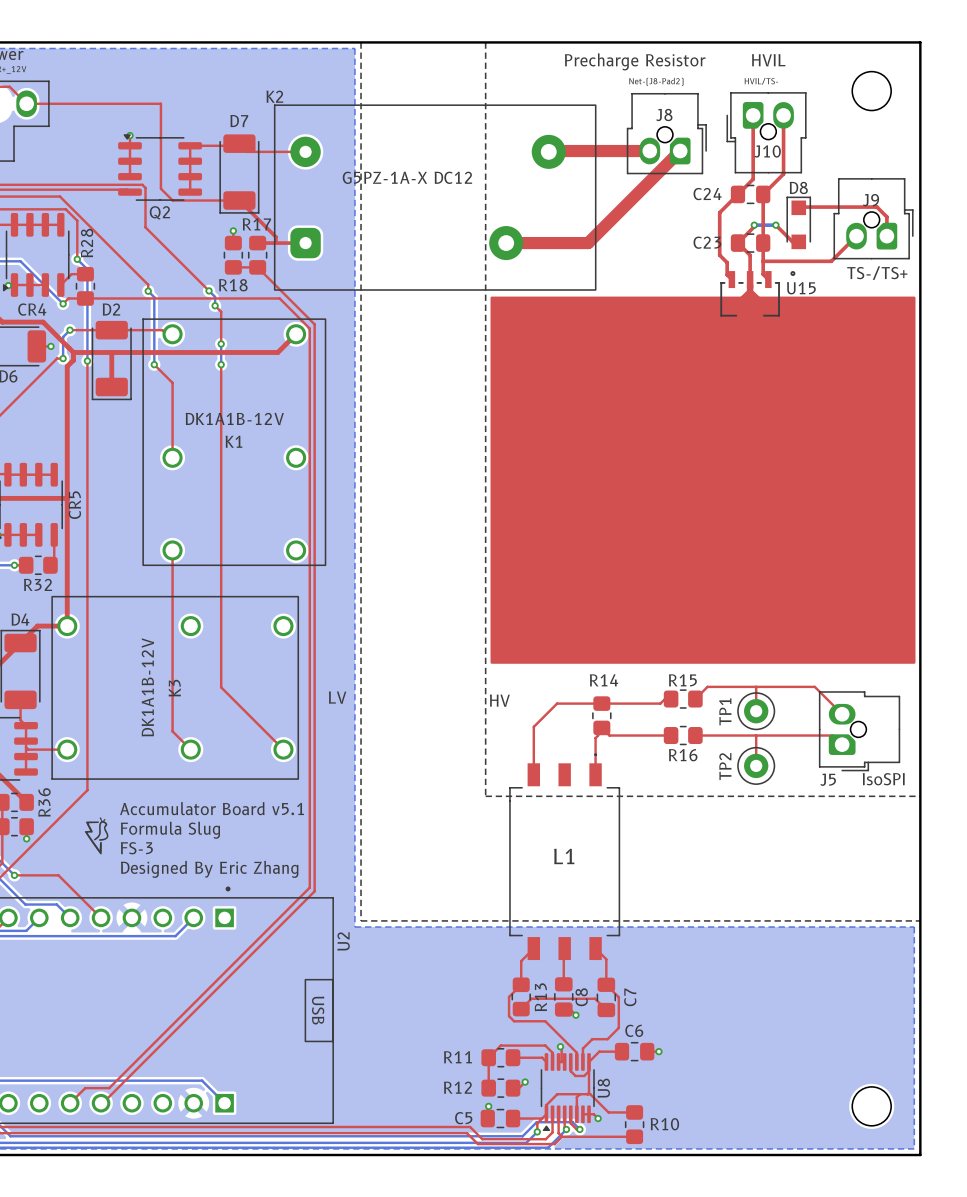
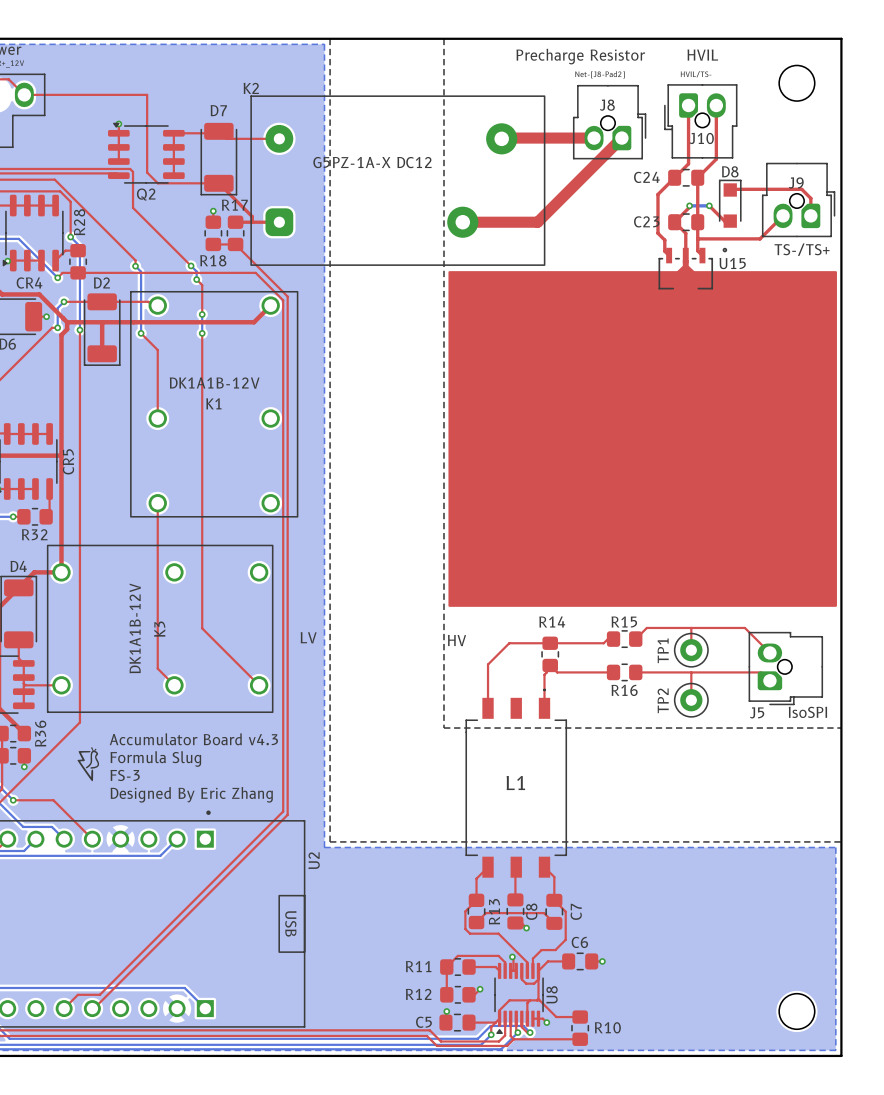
text: Accumulator Board v5.1 (212, 808) -> Accumulator Board v4.3 (193, 739)

